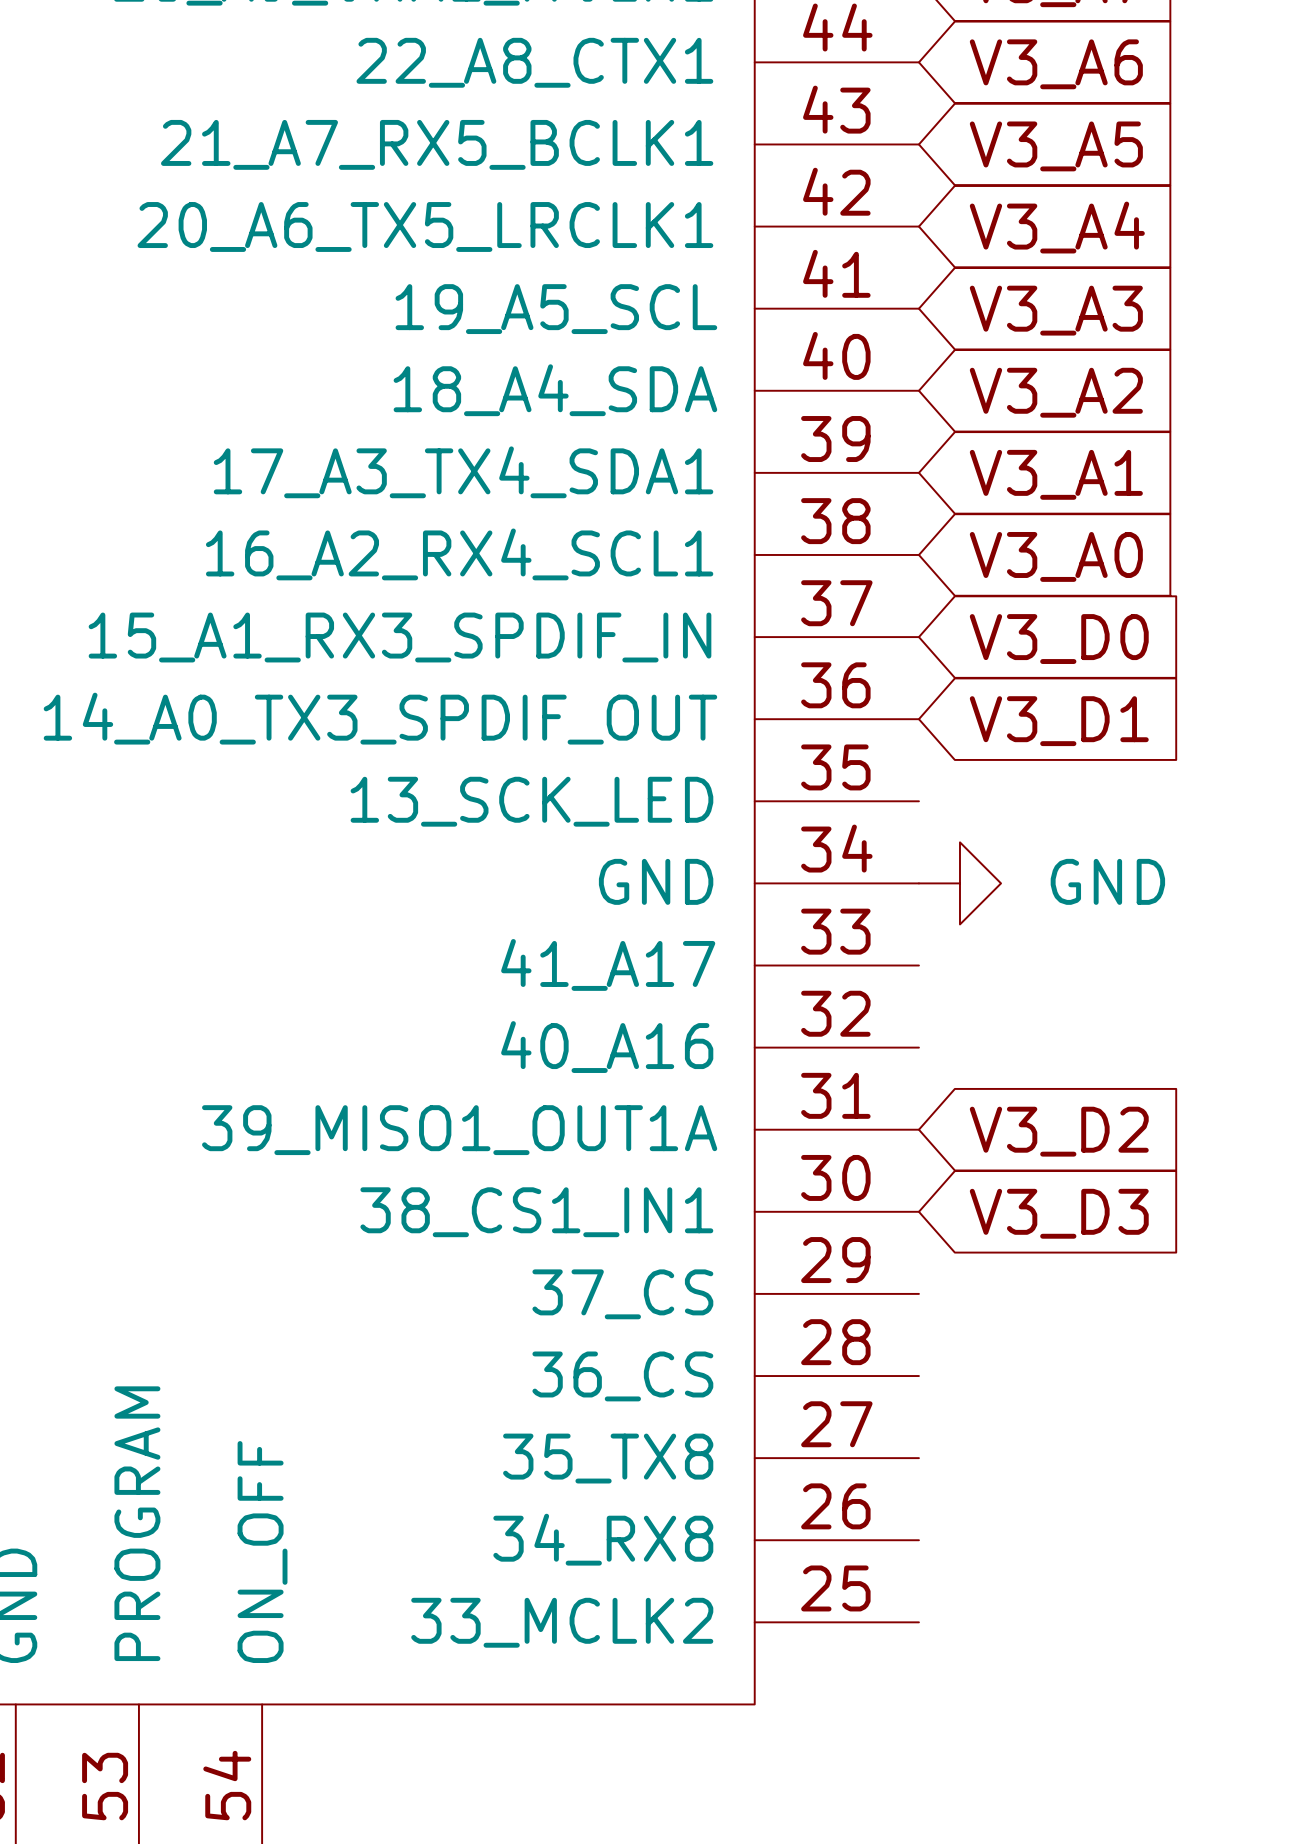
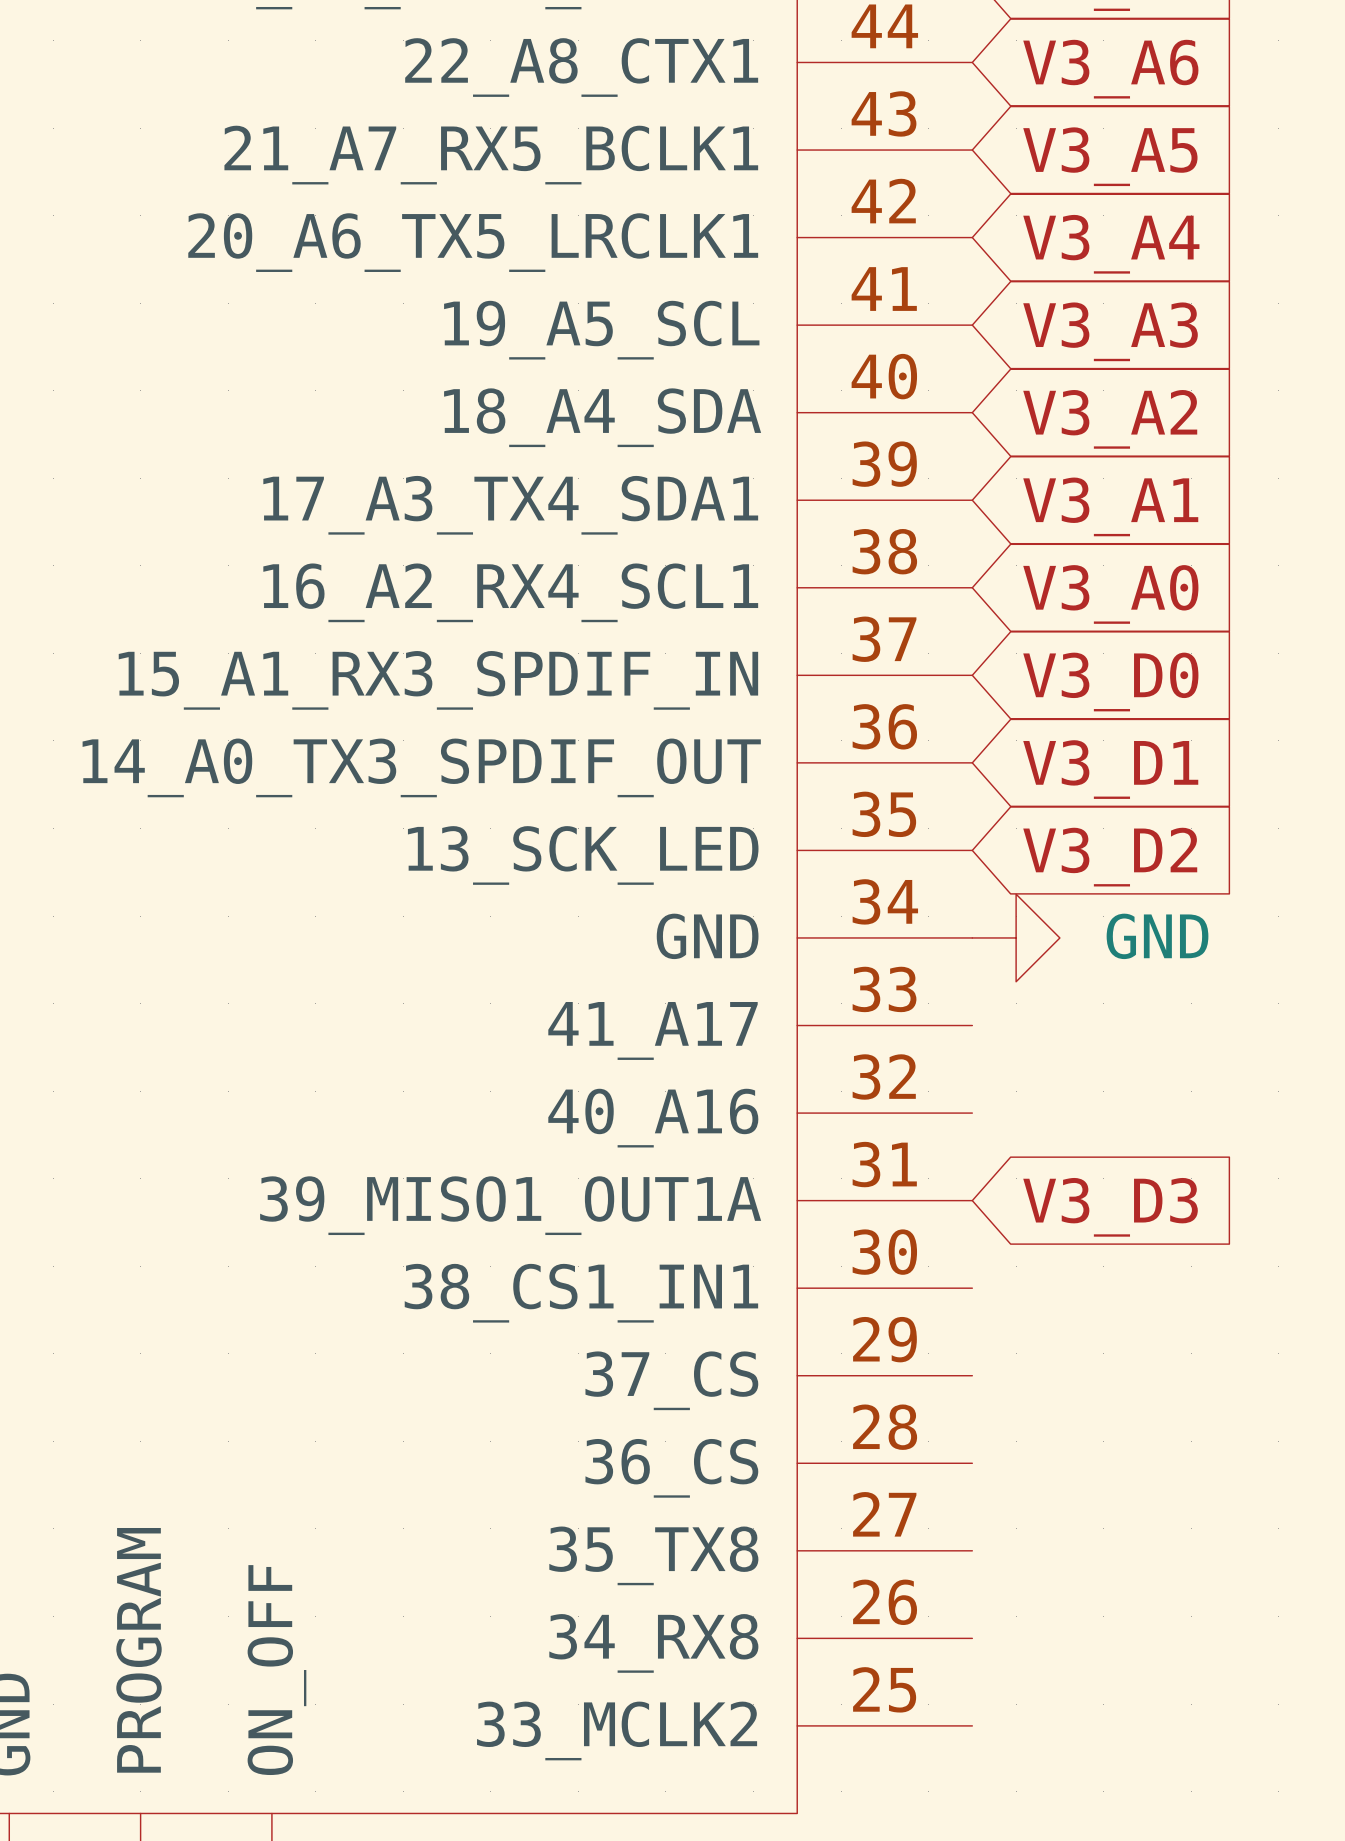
global label: none -> V3_D2 (1110, 857)
global label: V3_D2 (1059, 1131) -> V3_D3 (1110, 1207)
global label: V3_D3 (1059, 1213) -> none

